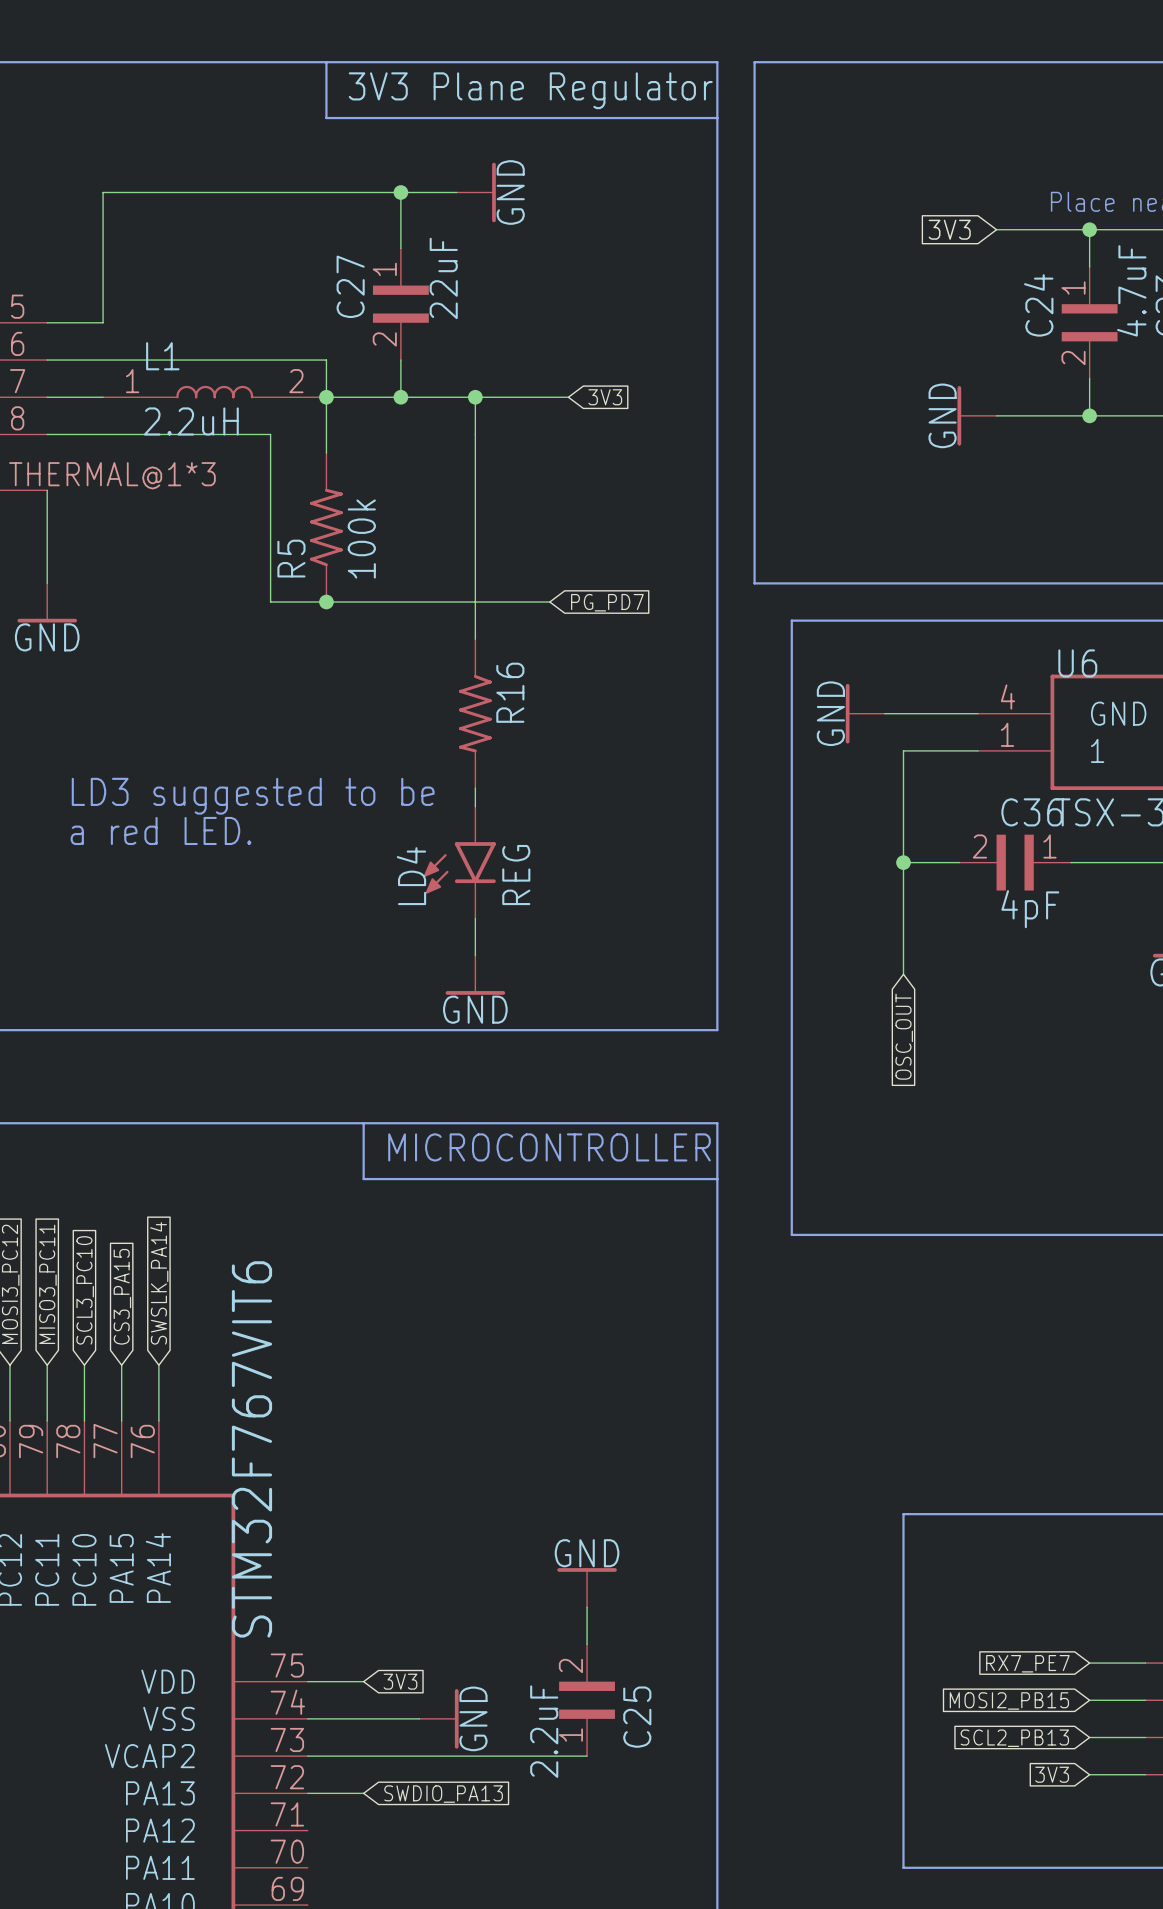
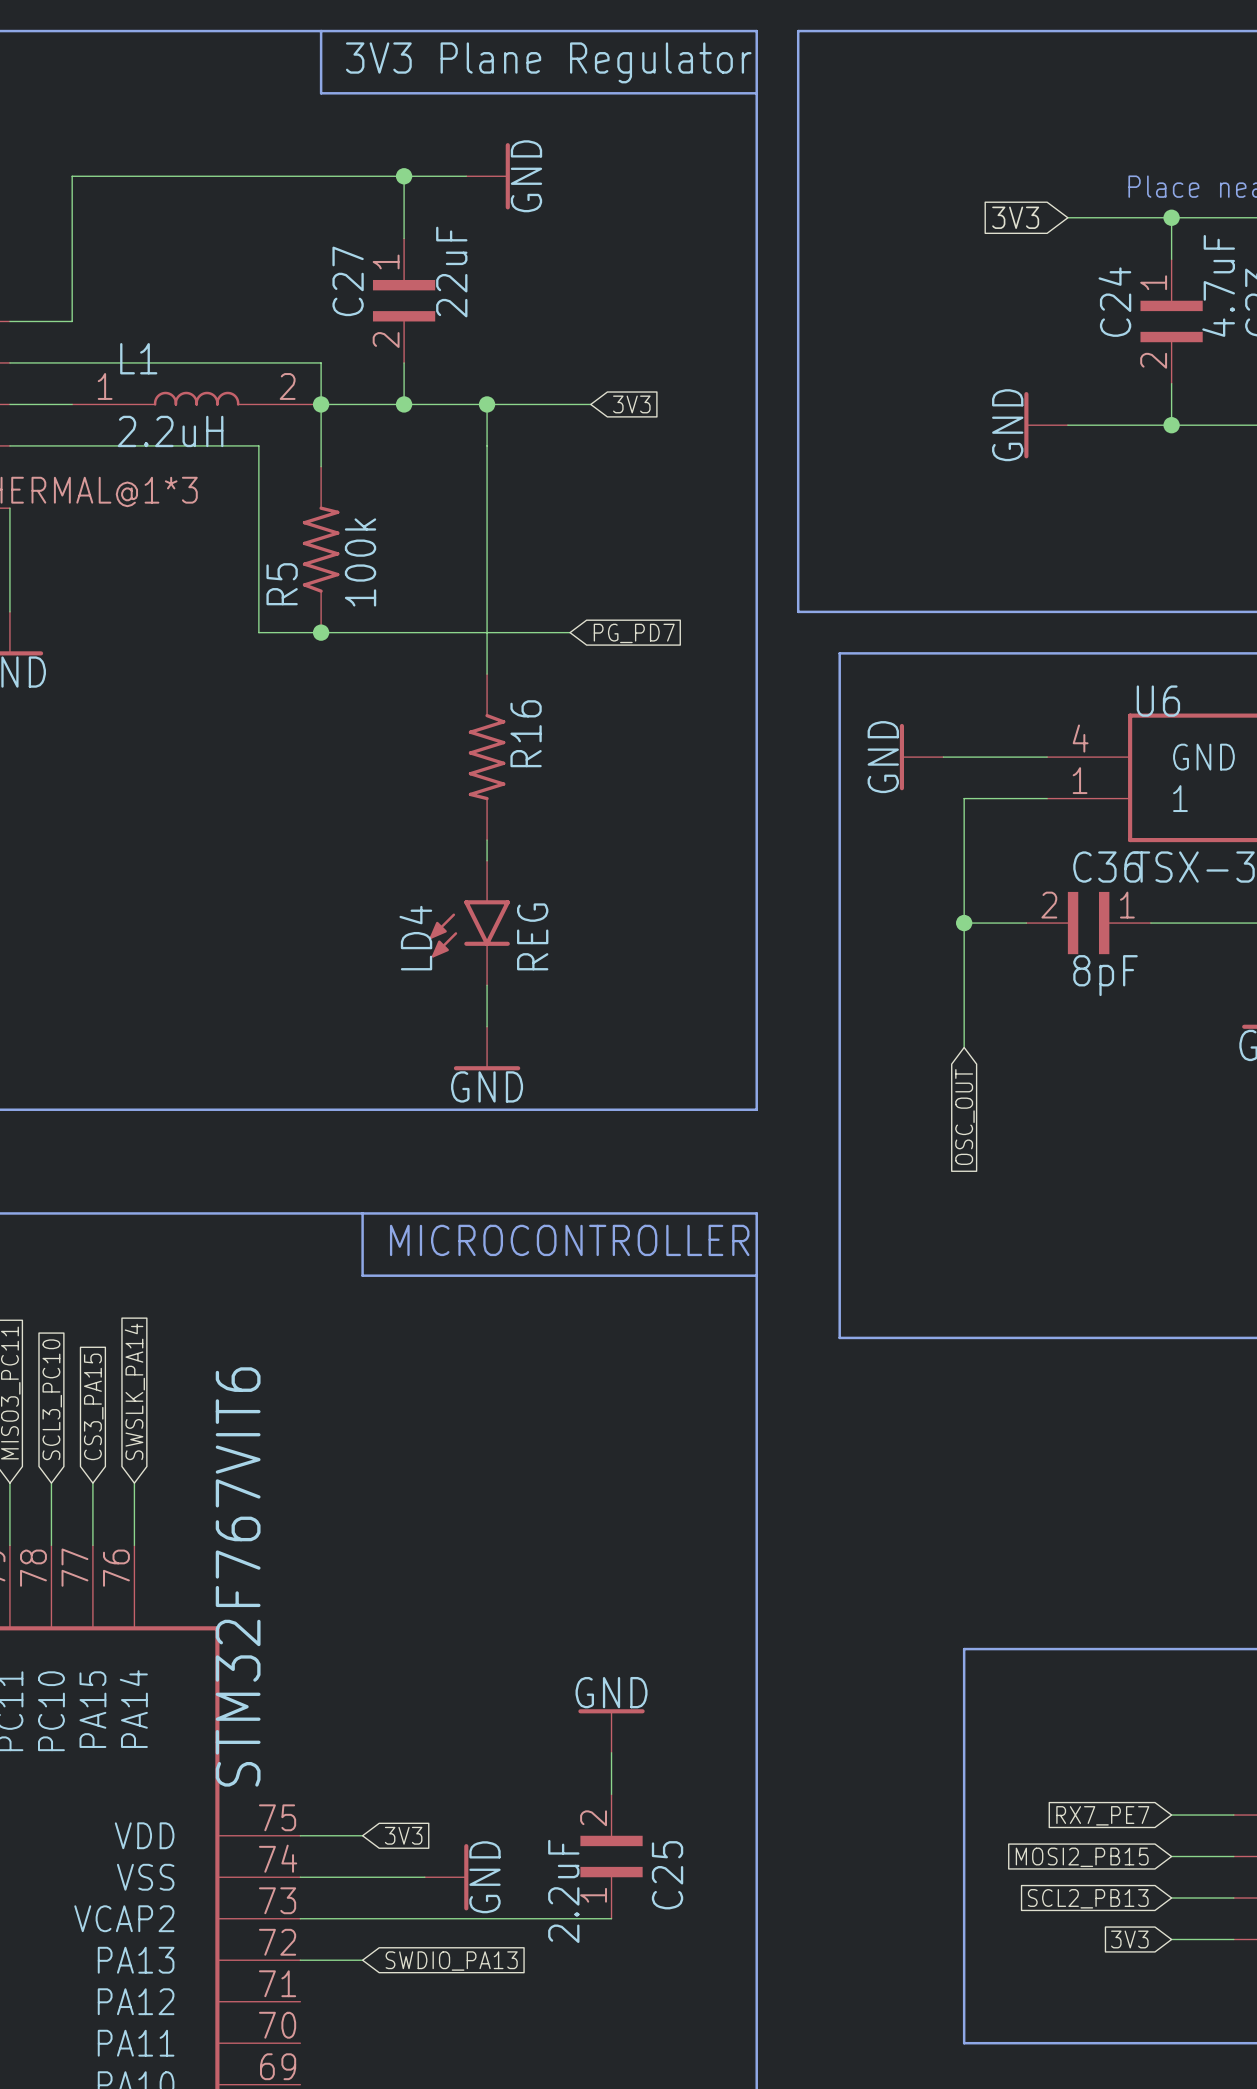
text: LD3 suggested to be (253, 796) -> none
text: a red LED. (161, 830) -> none
C36 value: 4pF (1030, 909) -> 8pF (1105, 975)

